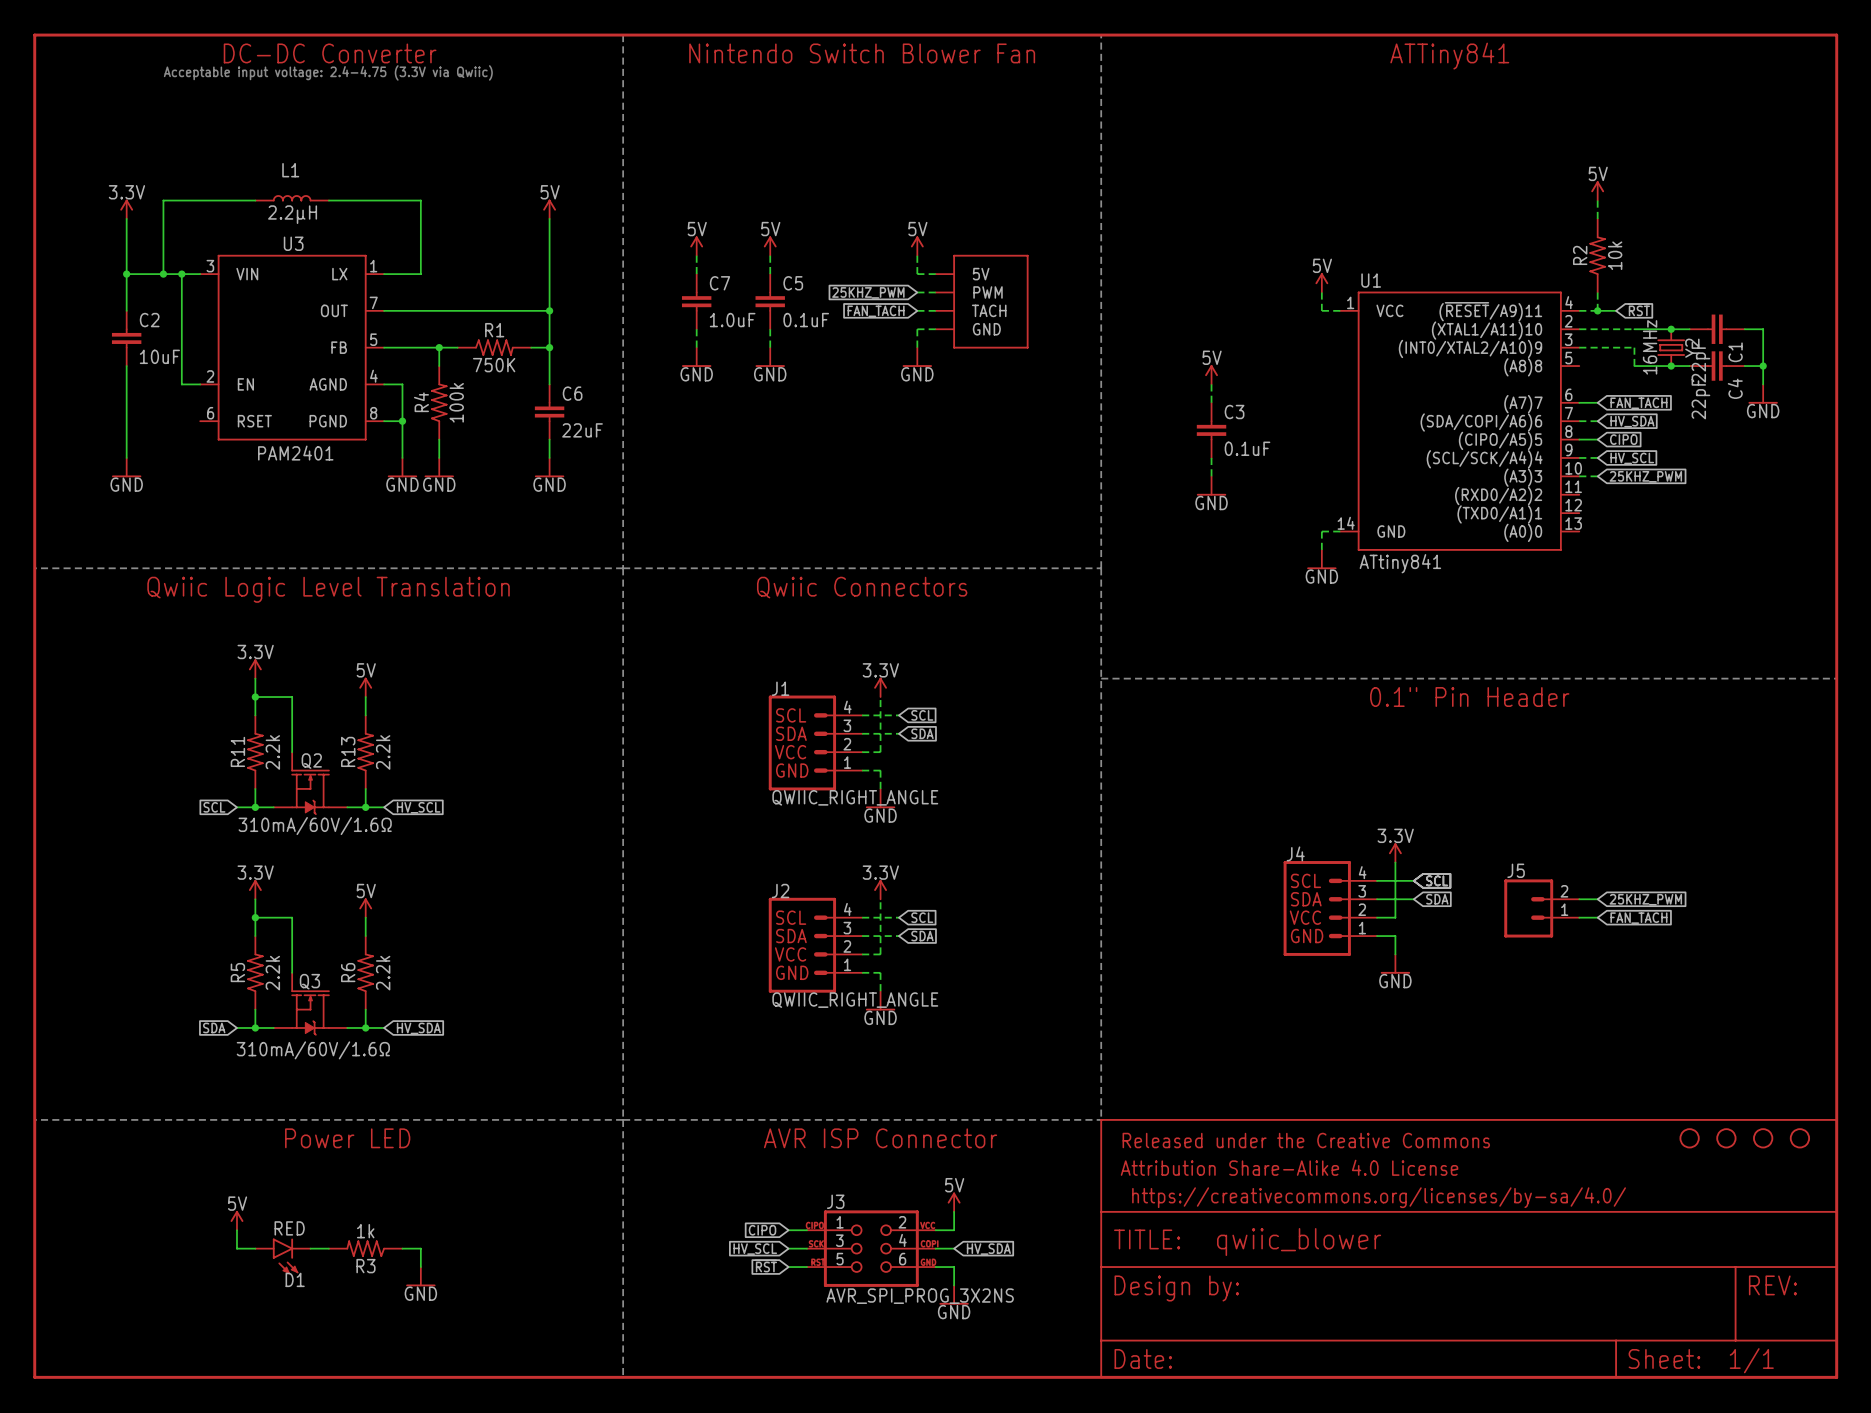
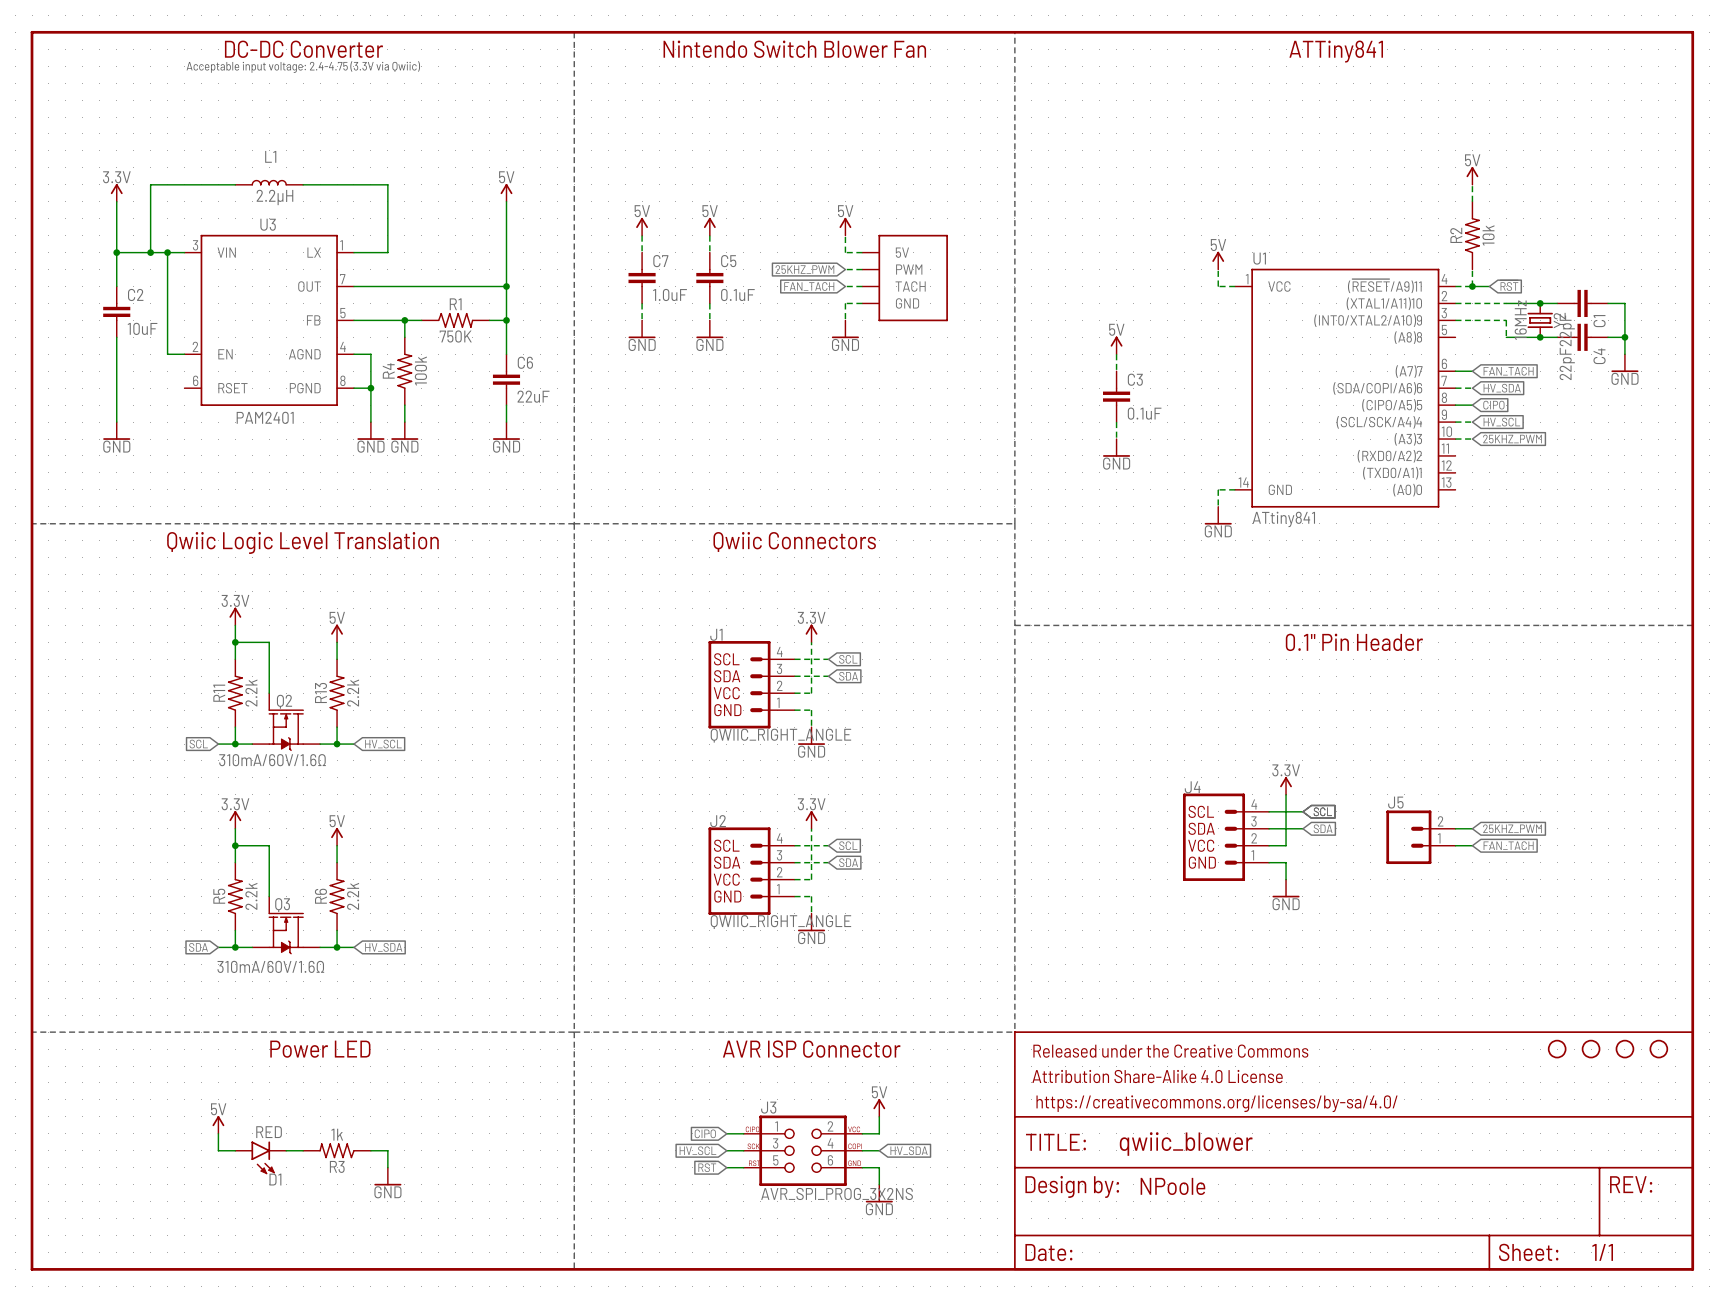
text: none -> NPoole (1172, 1186)

